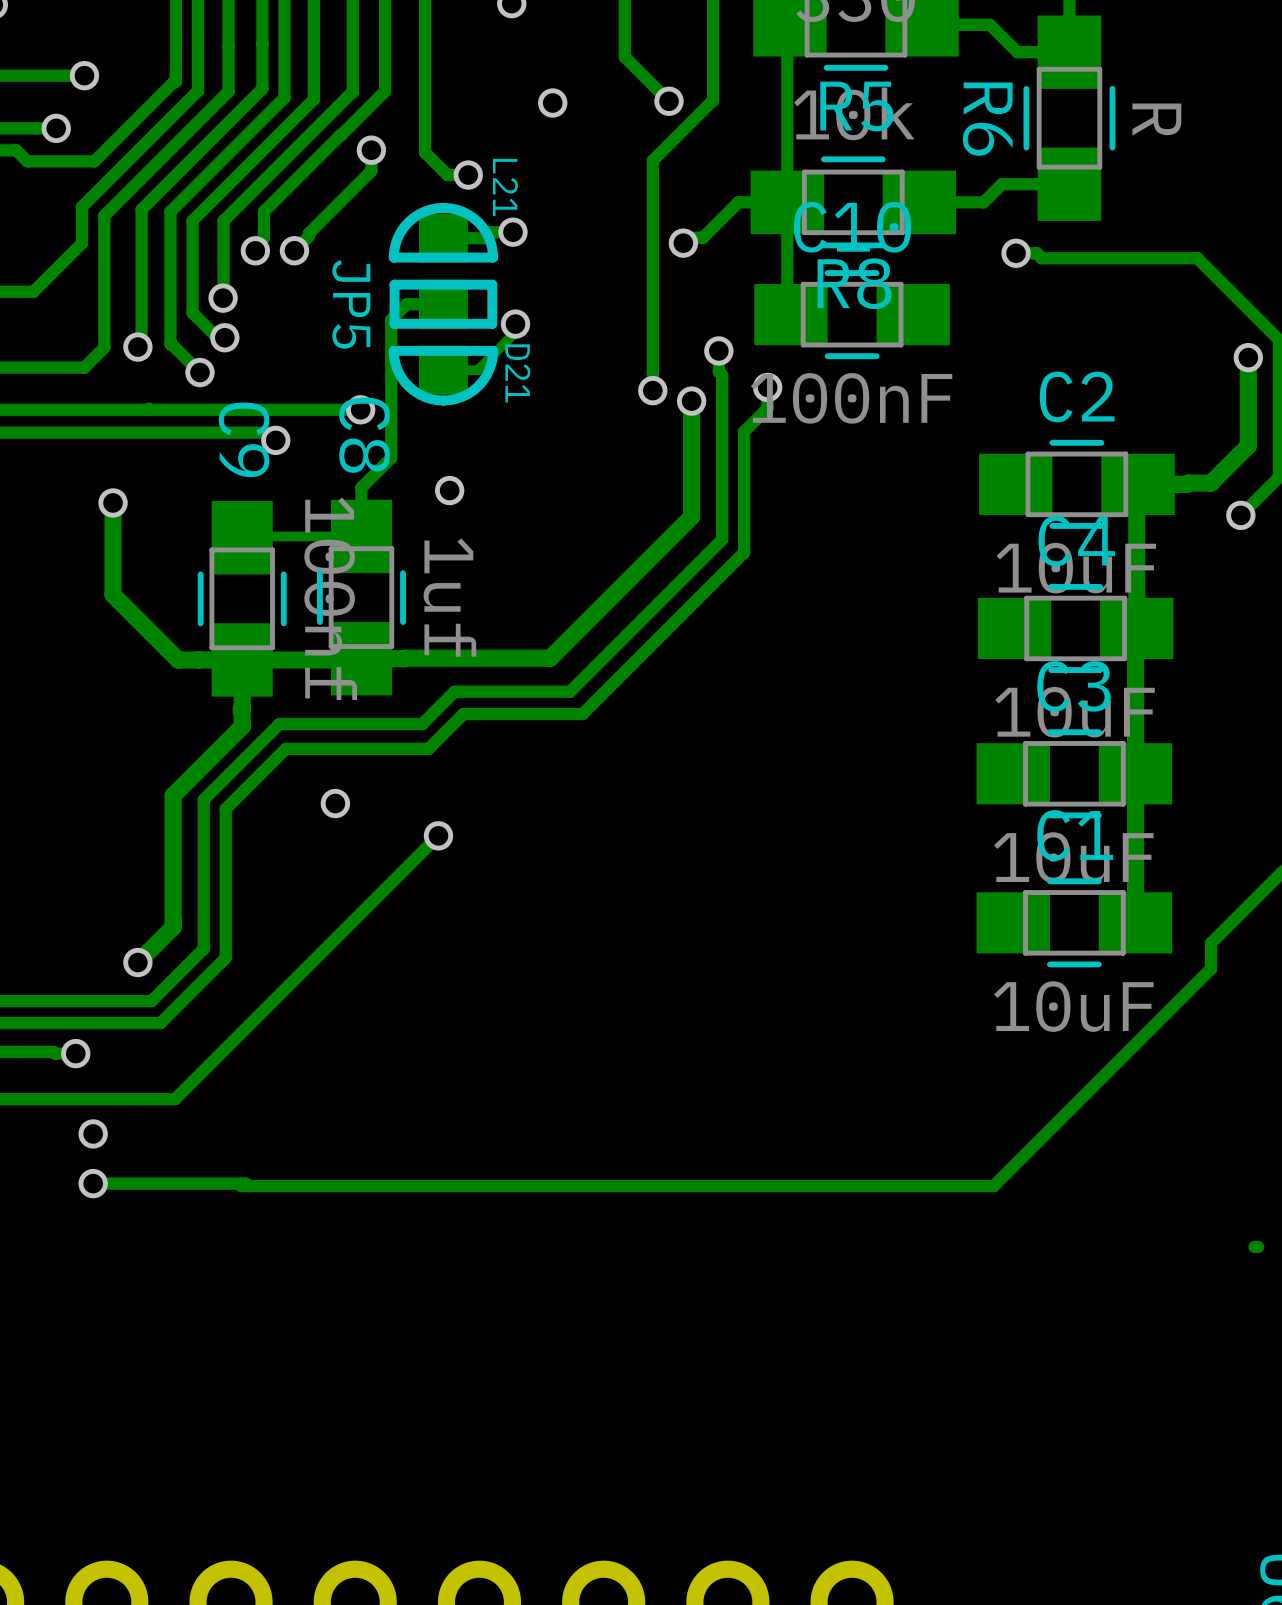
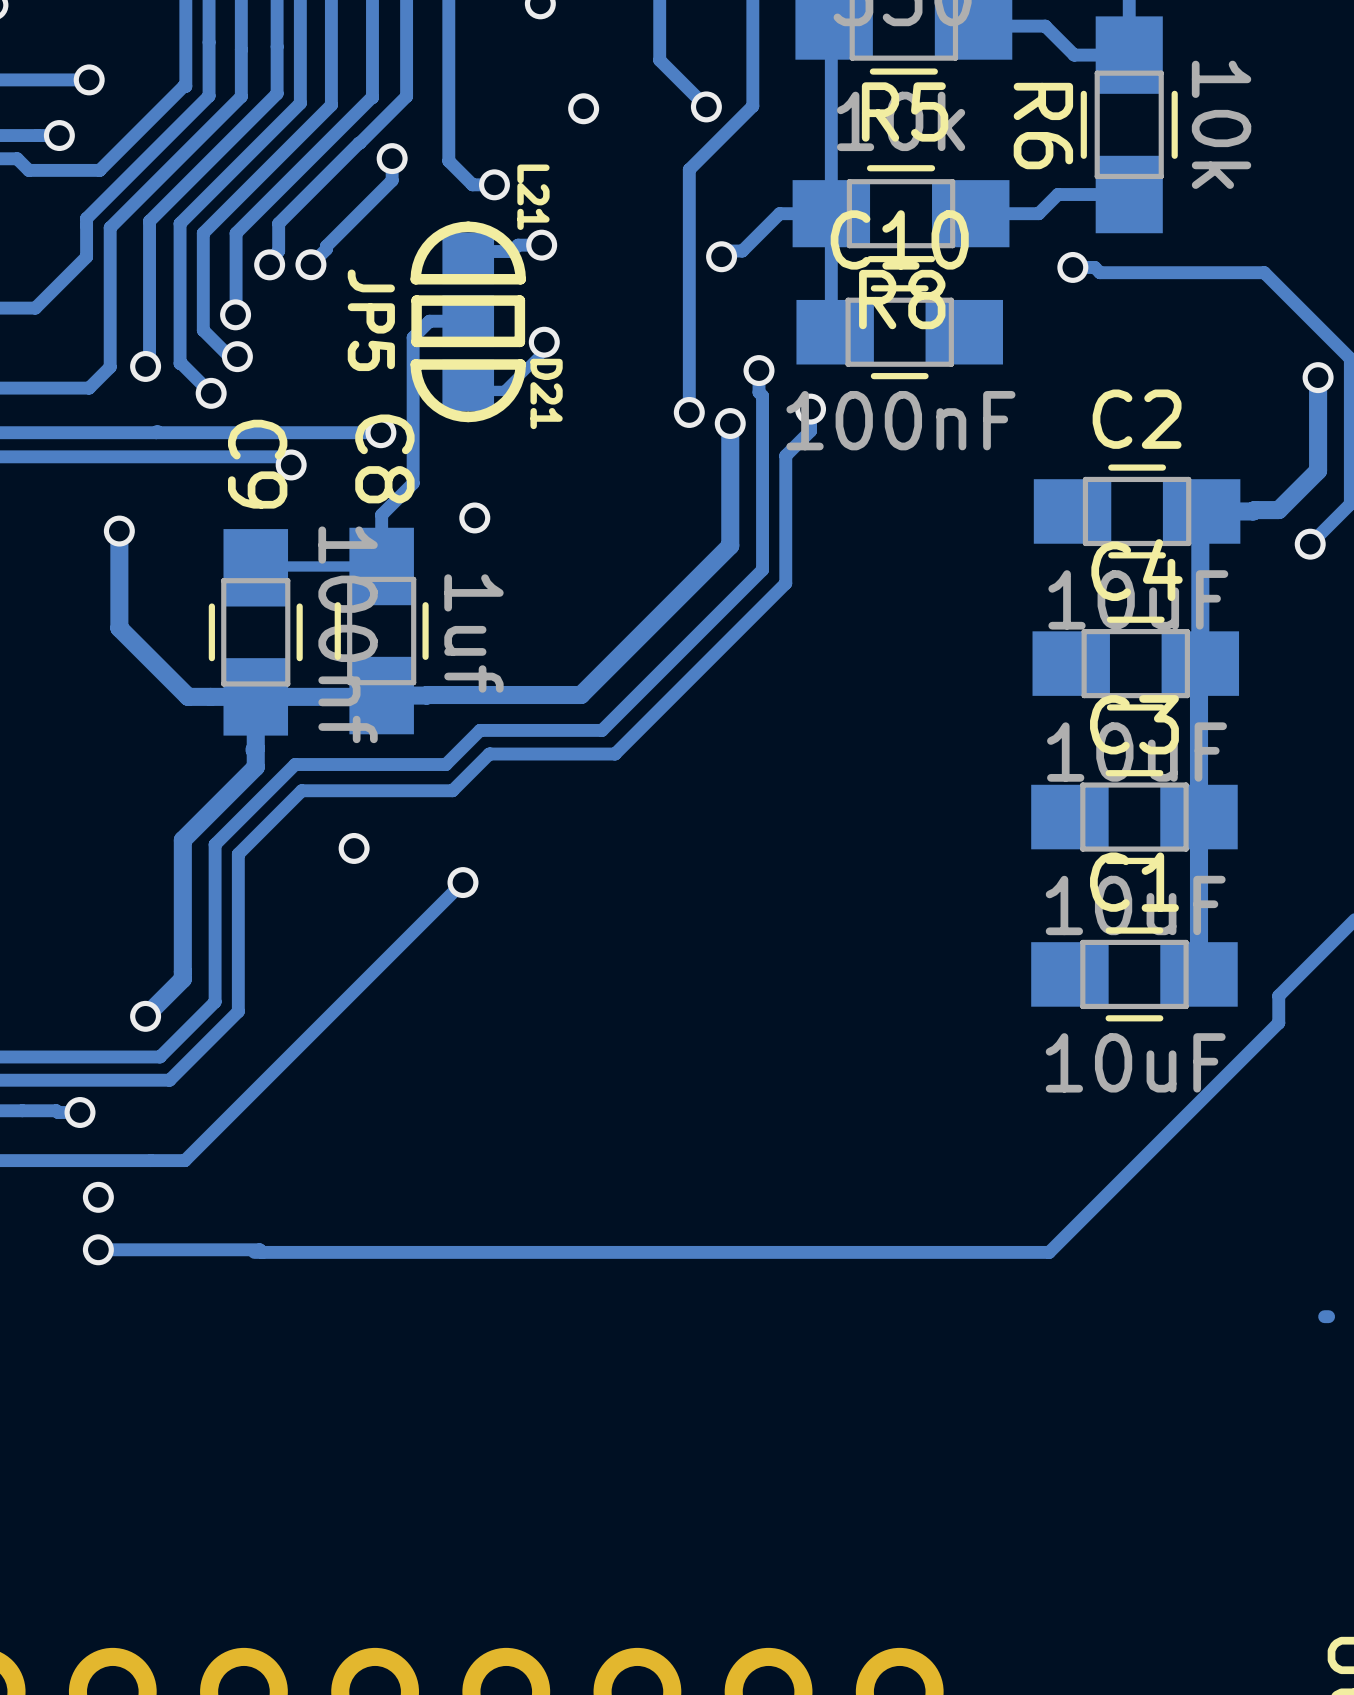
R6 value: R (1156, 119) -> 10k (1221, 124)
JP5 footprint: [388, 202, 499, 406] -> [410, 221, 526, 423]

